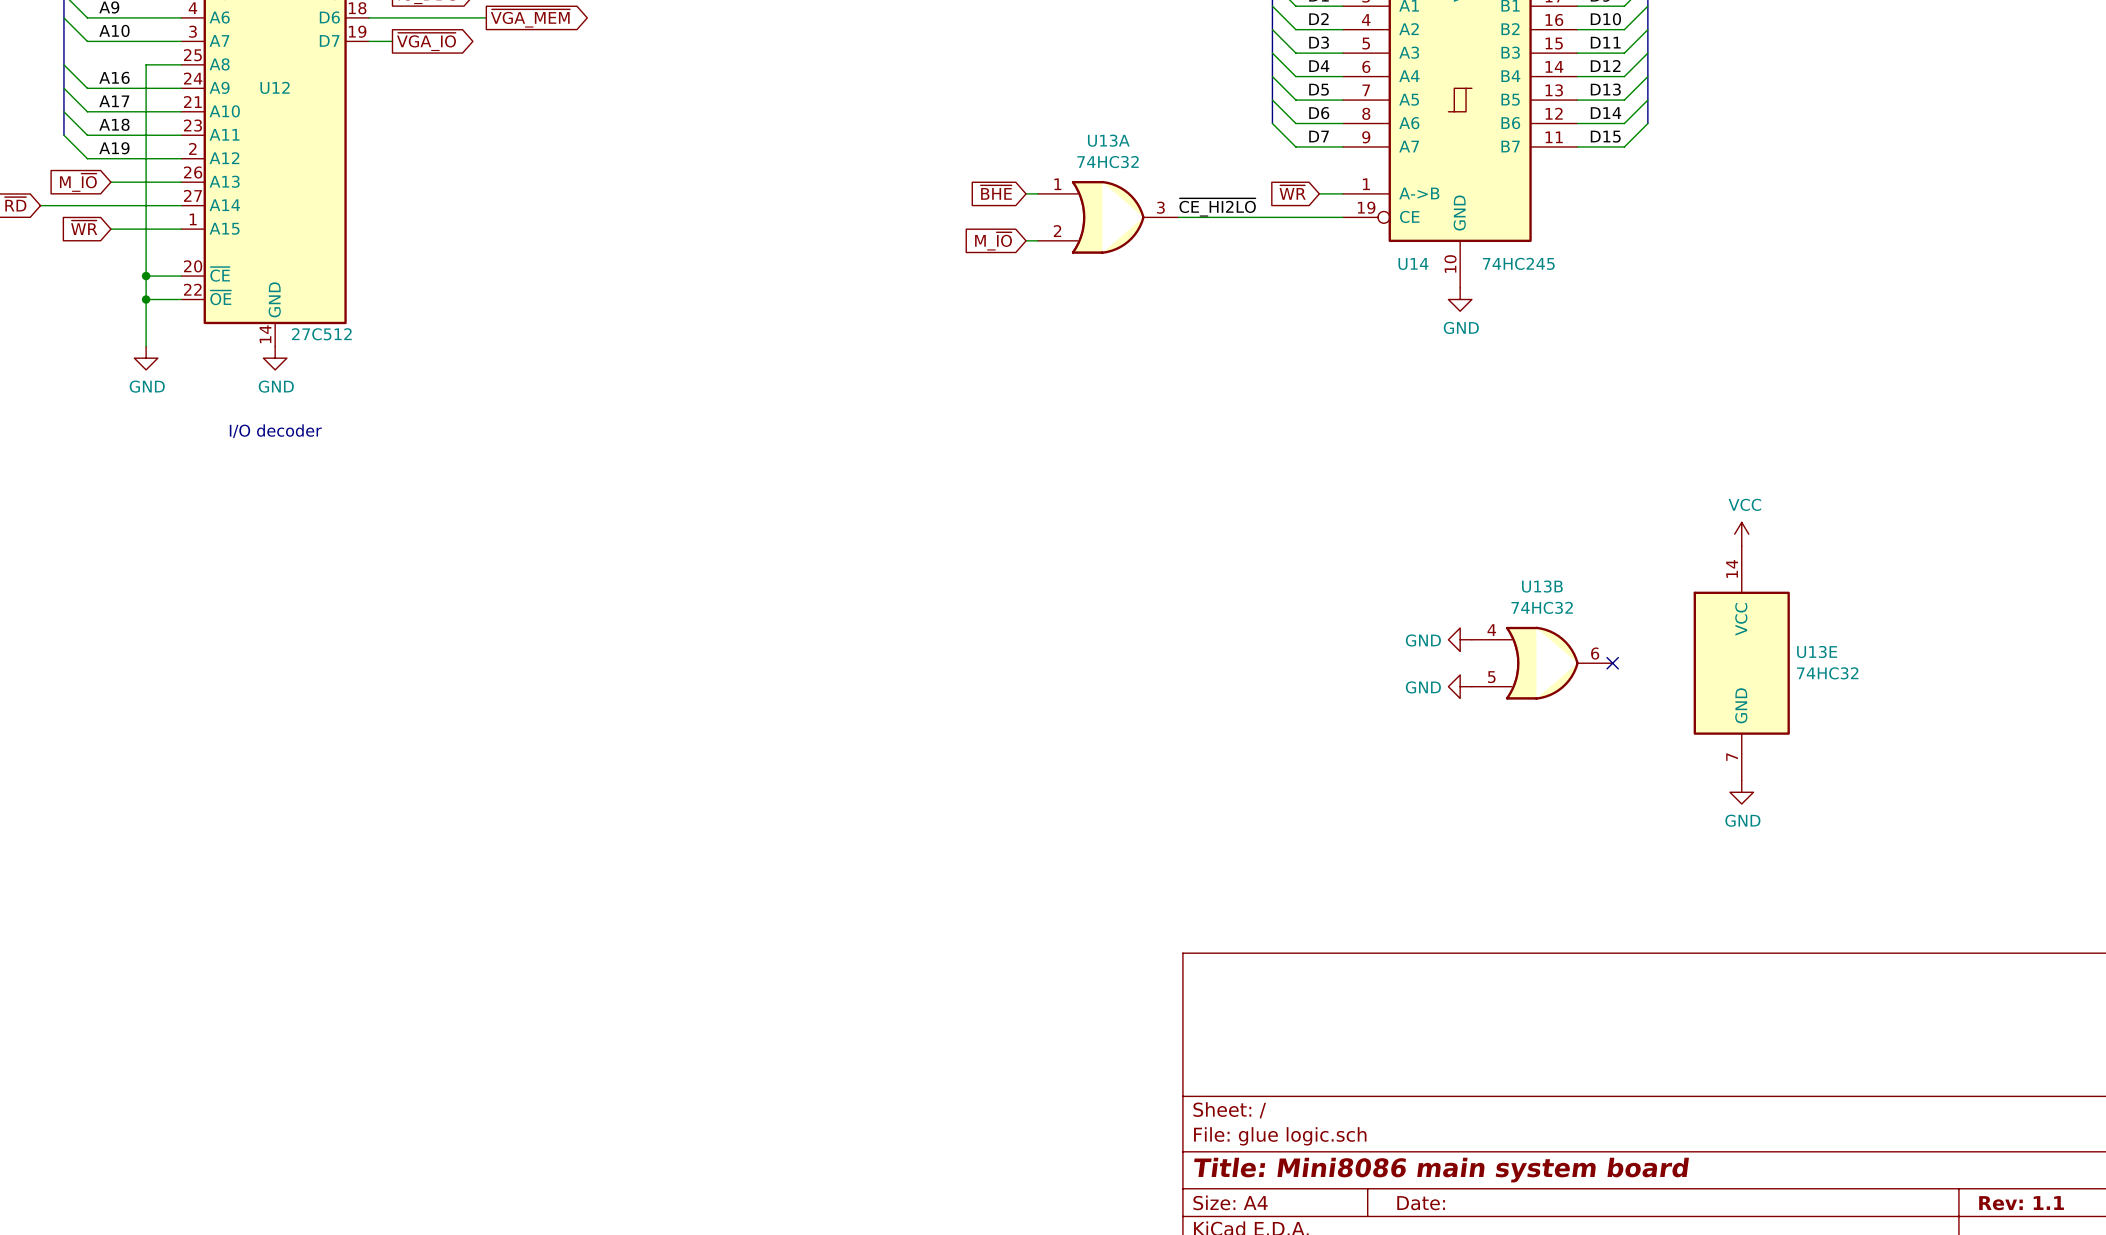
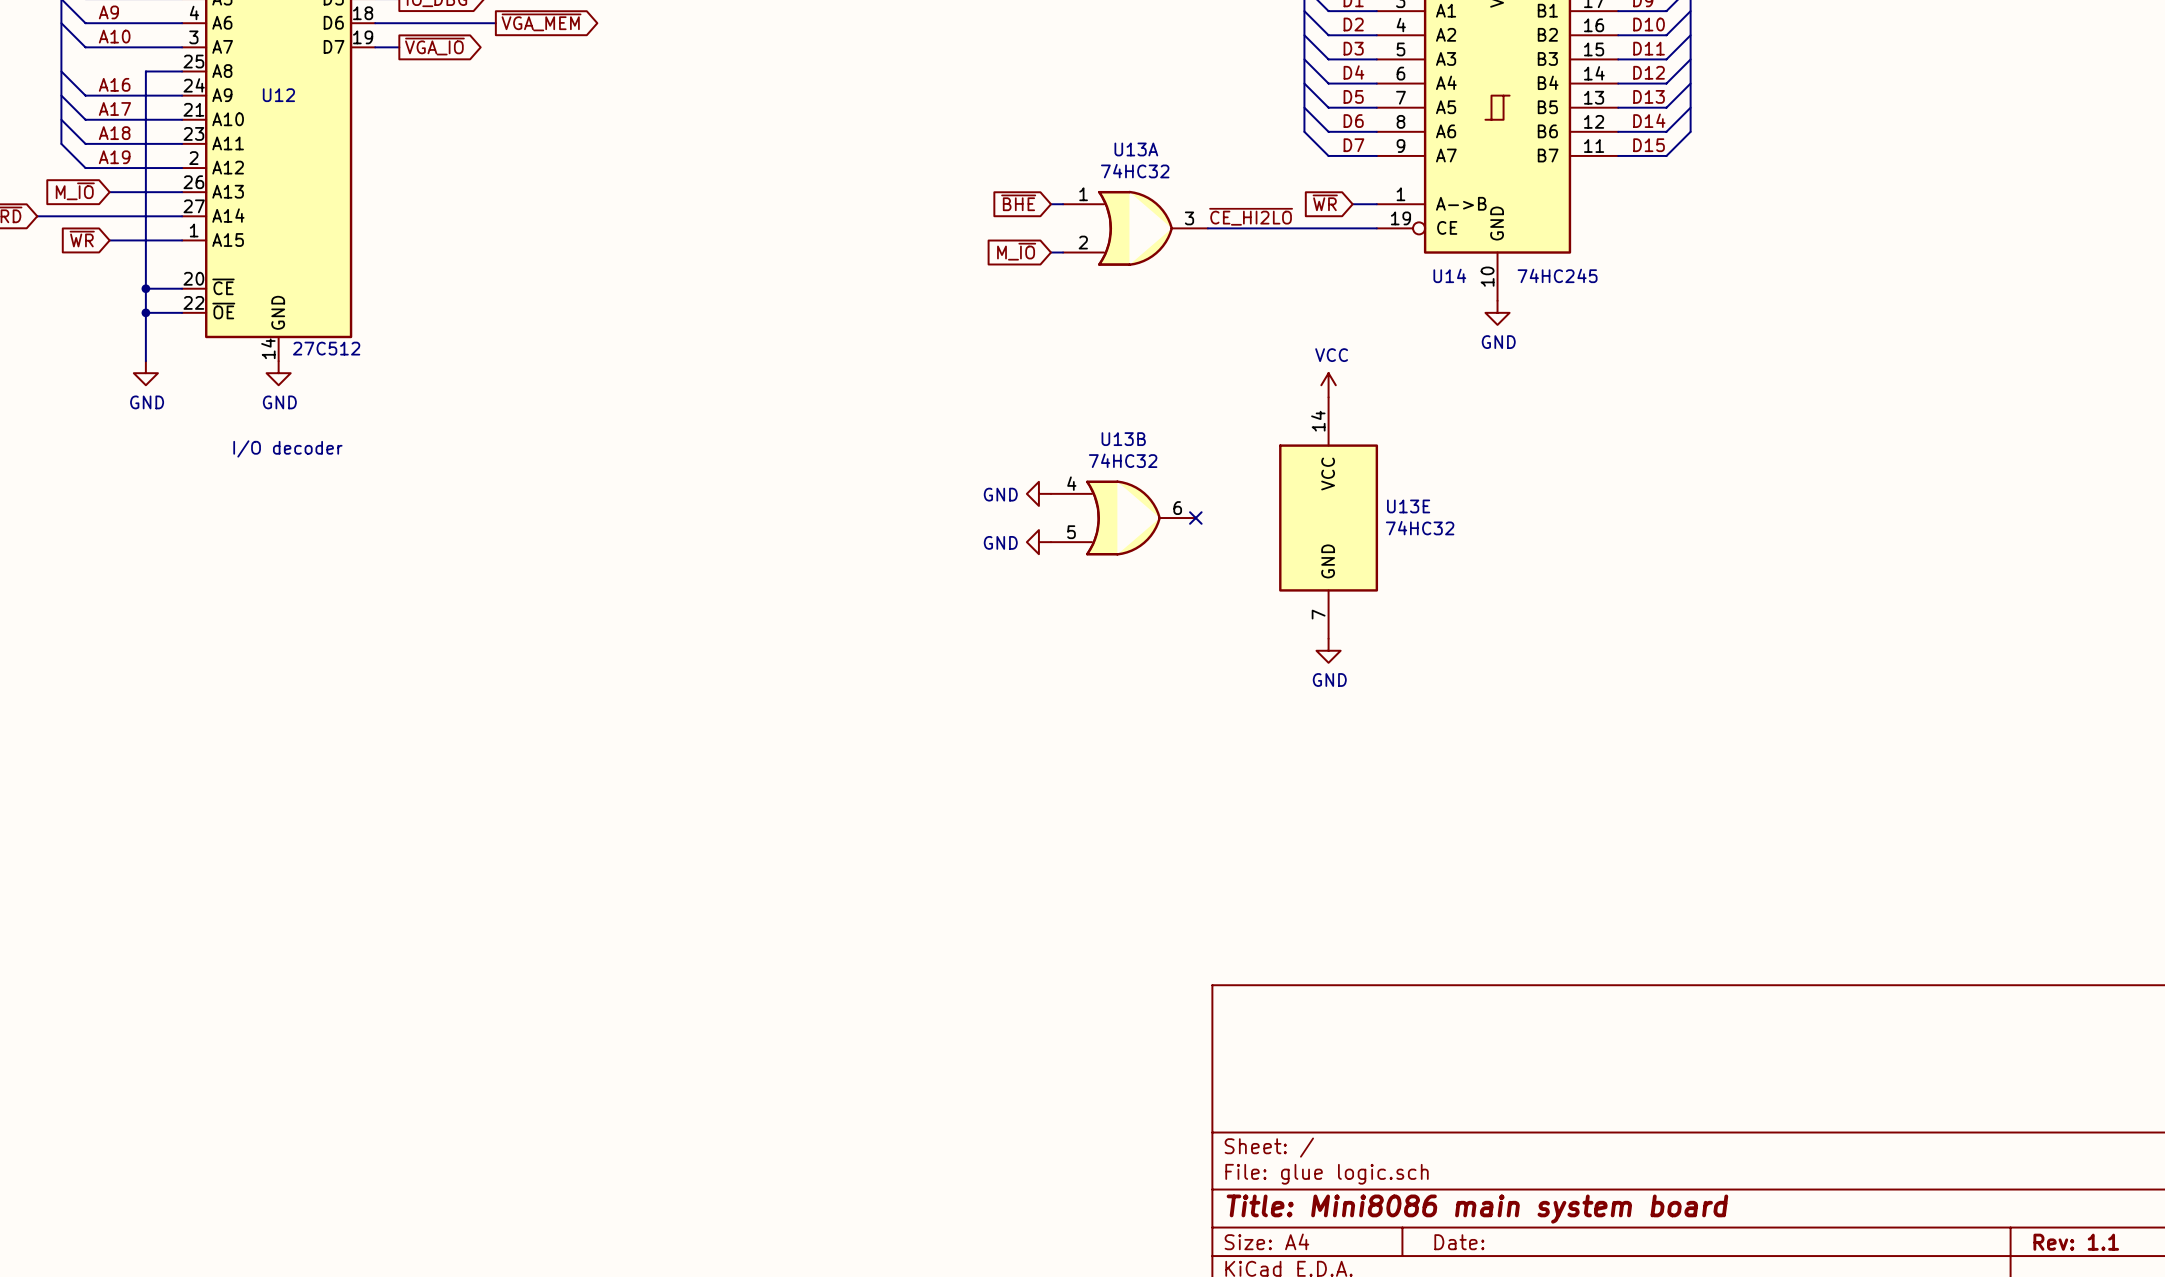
power symbol: none -> VCC (1328, 385)
power symbol: none -> GND (1038, 493)
no-connect mark: none -> (1195, 518)
power symbol: none -> GND (1038, 542)
power symbol: VCC (1741, 534) -> none
power symbol: none -> GND (1328, 650)
power symbol: GND (1460, 639) -> none
U13B position: (1542, 663) -> (1123, 518)
no-connect mark: (1612, 663) -> none
U13E position: (1741, 663) -> (1328, 518)
power symbol: GND (1460, 686) -> none
power symbol: GND (1741, 792) -> none

